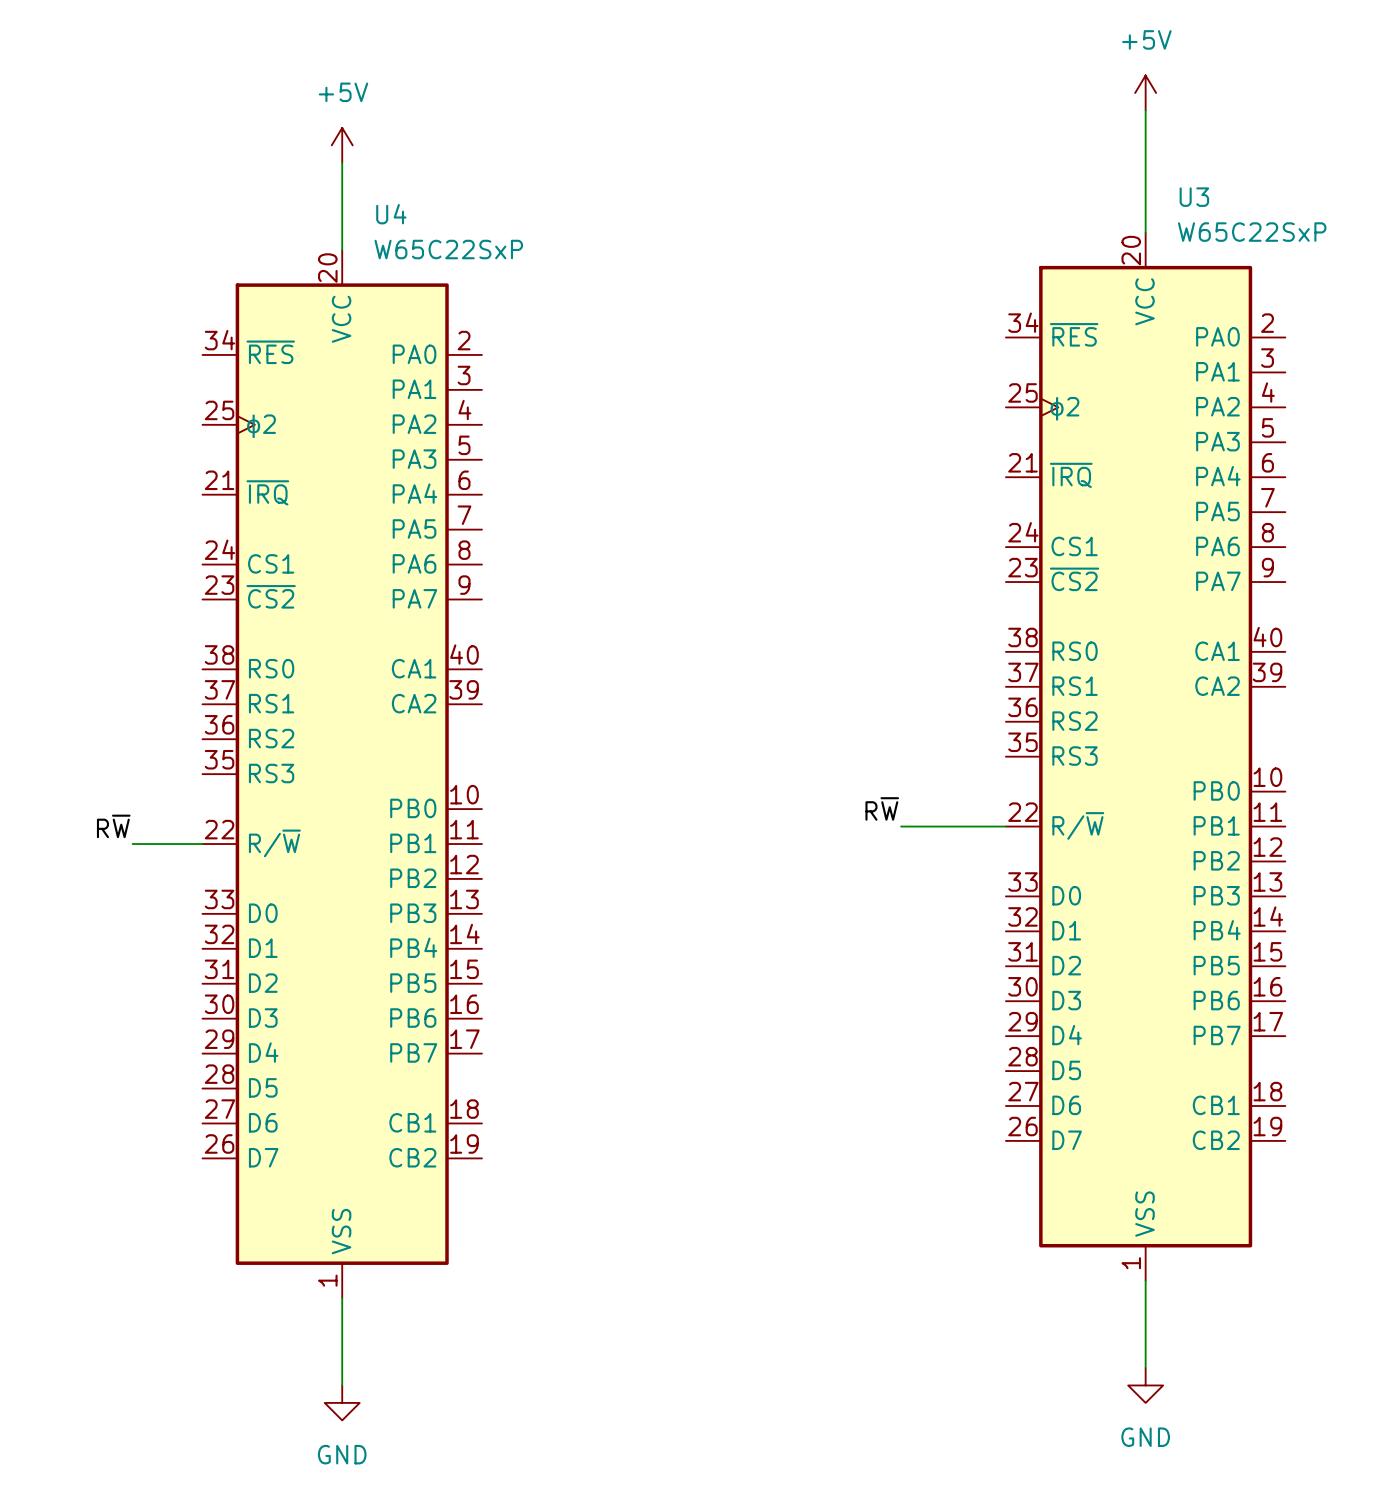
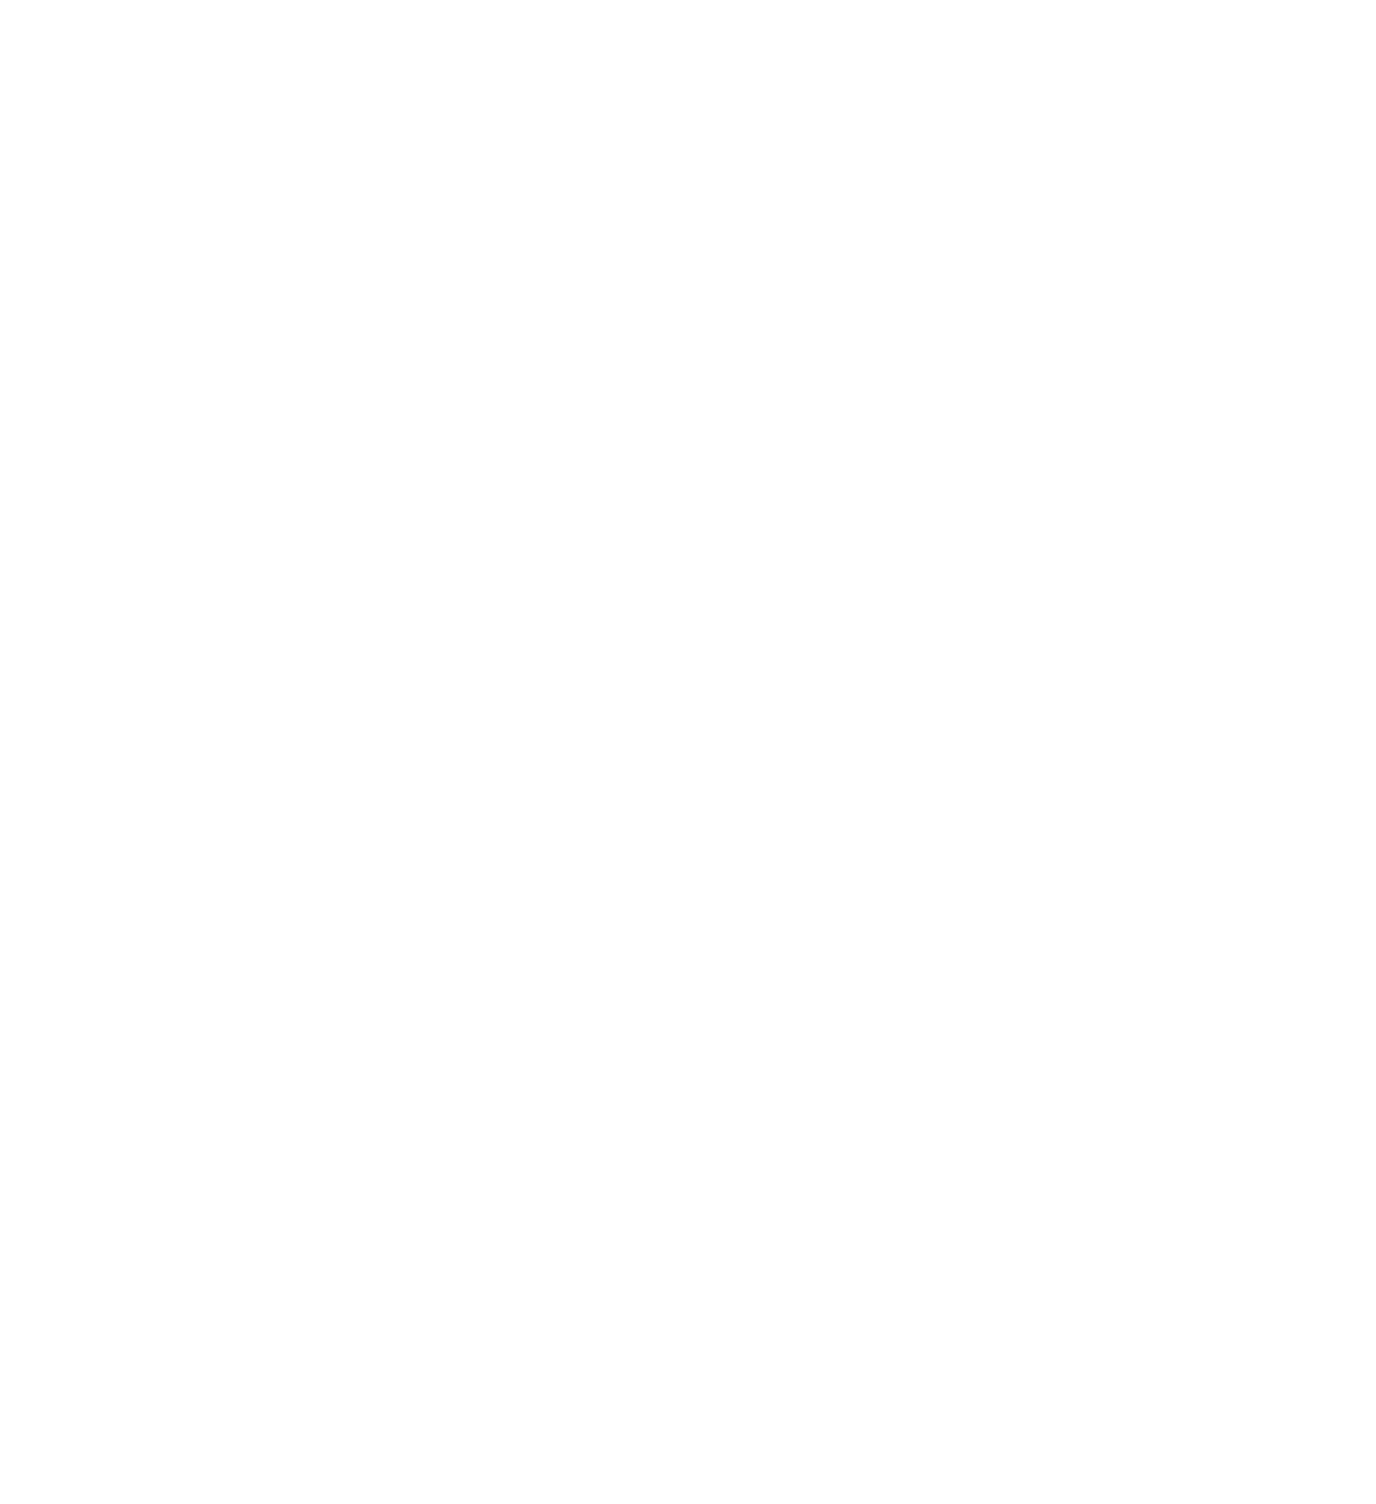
power symbol: +5V (1145, 92) -> none
wire: (1145, 110) (1145, 232) -> none
power symbol: +5V (342, 145) -> none
wire: (342, 162) (342, 250) -> none
U3: W65C22SxP (1145, 756) -> none
U4: W65C22SxP (342, 774) -> none
label: R~{W} (882, 808) -> none
label: R~{W} (113, 826) -> none
wire: (901, 826) (1005, 826) -> none
wire: (132, 844) (202, 844) -> none
wire: (1145, 1280) (1145, 1367) -> none
wire: (342, 1298) (342, 1385) -> none
power symbol: GND (1145, 1385) -> none
power symbol: GND (342, 1402) -> none

